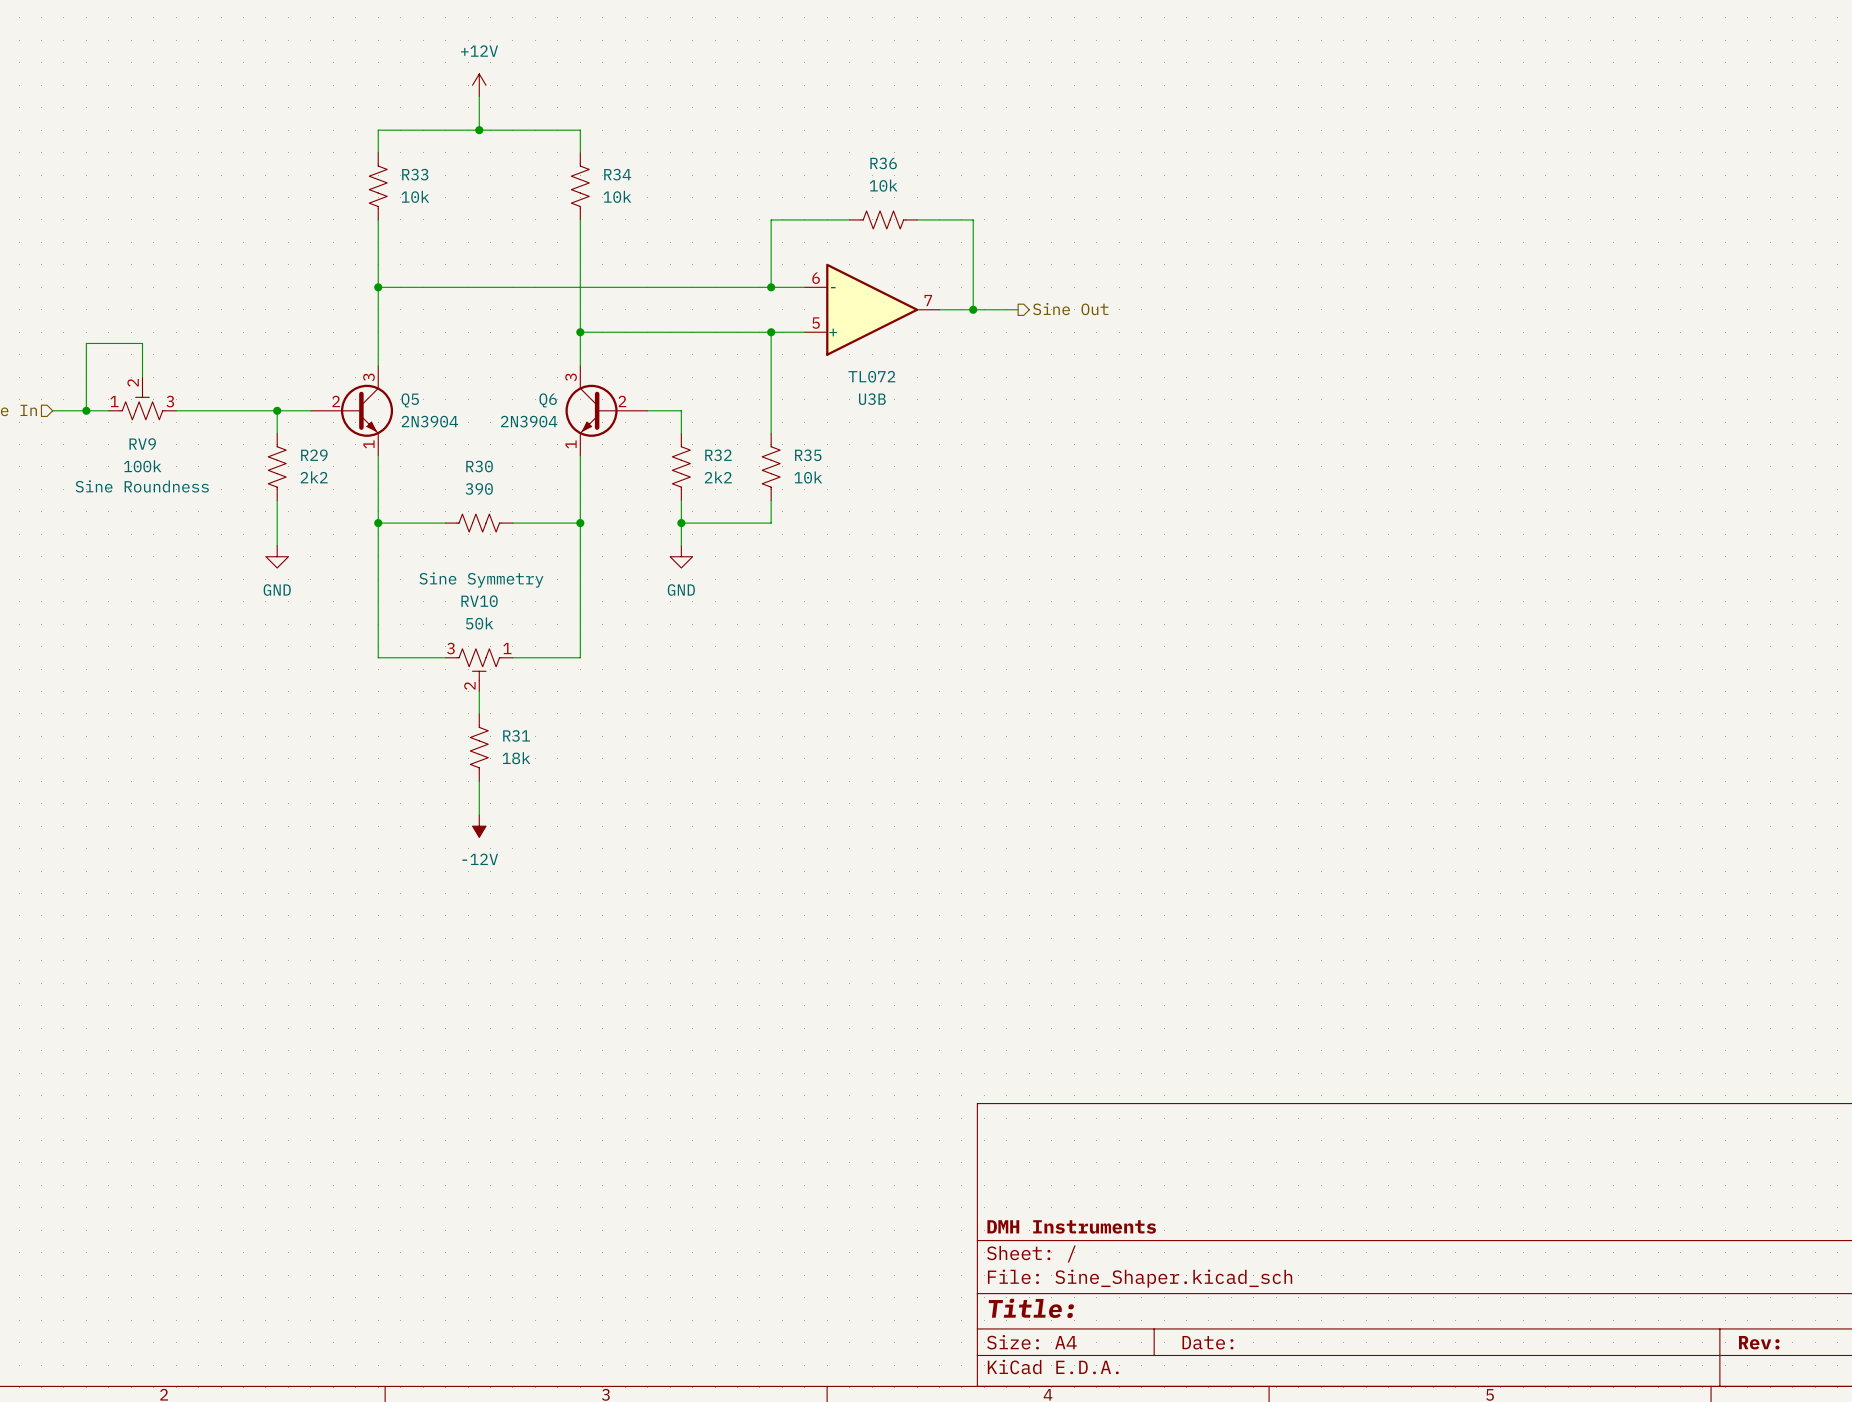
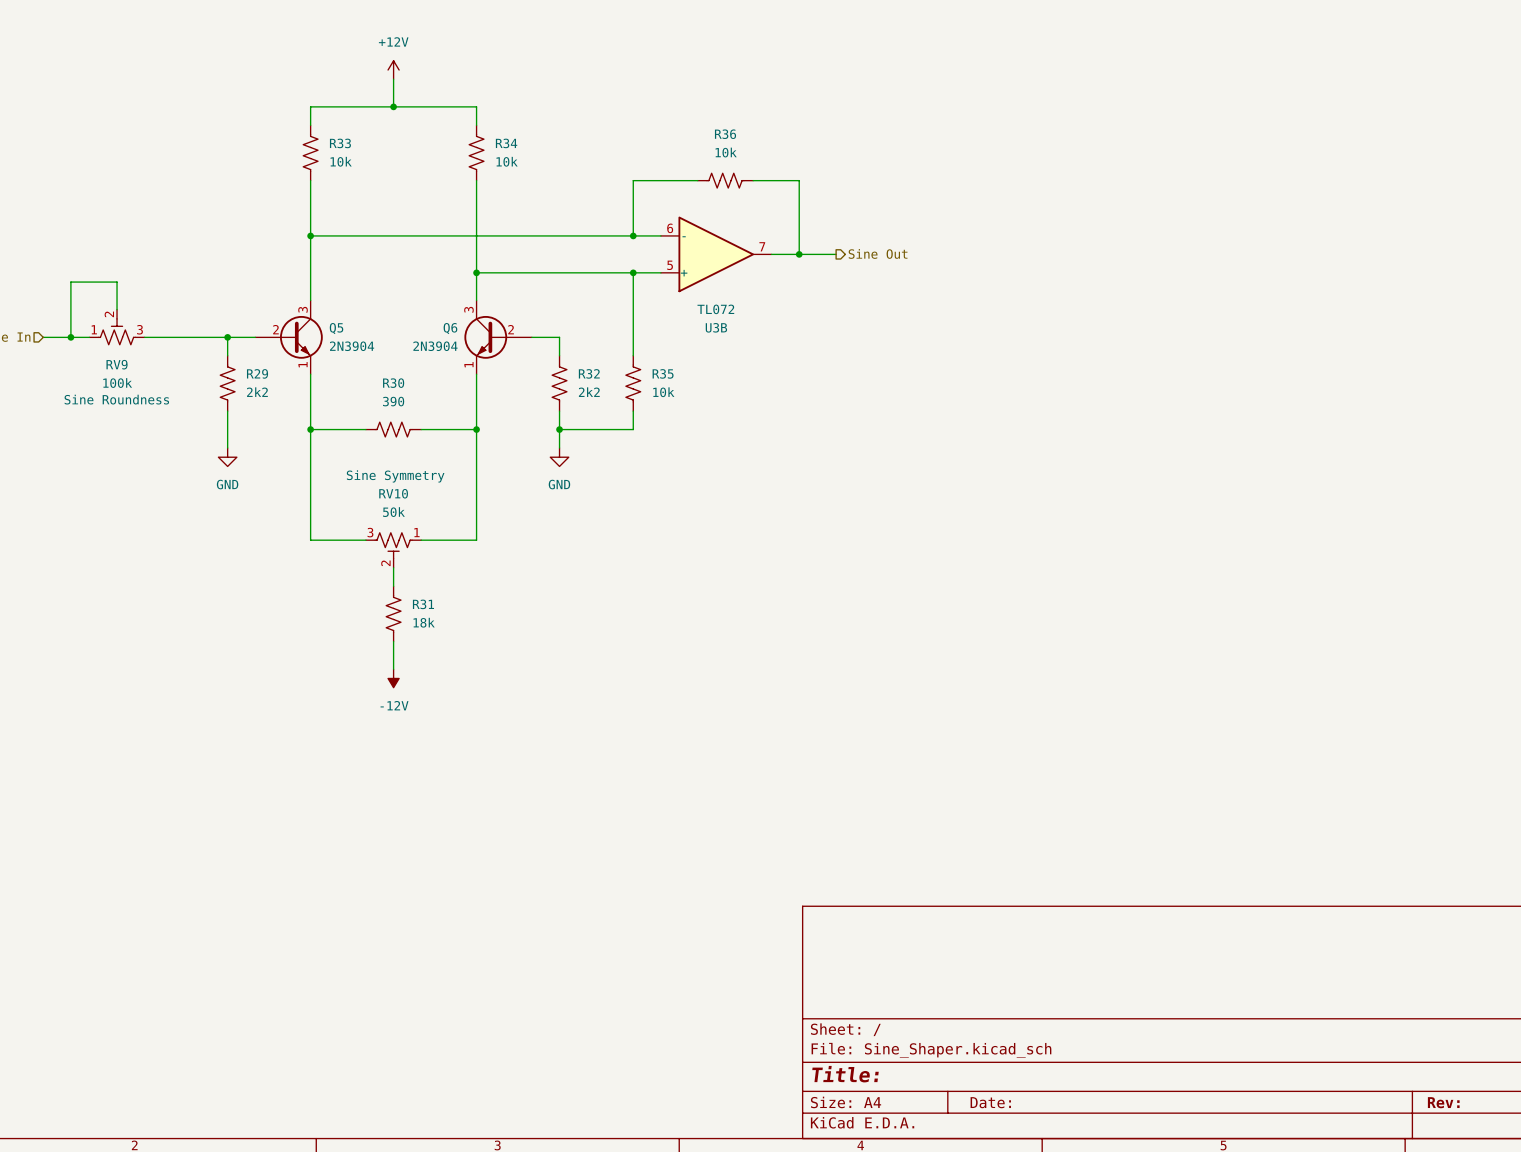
title block: DMH Instruments (1071, 1226) -> none

